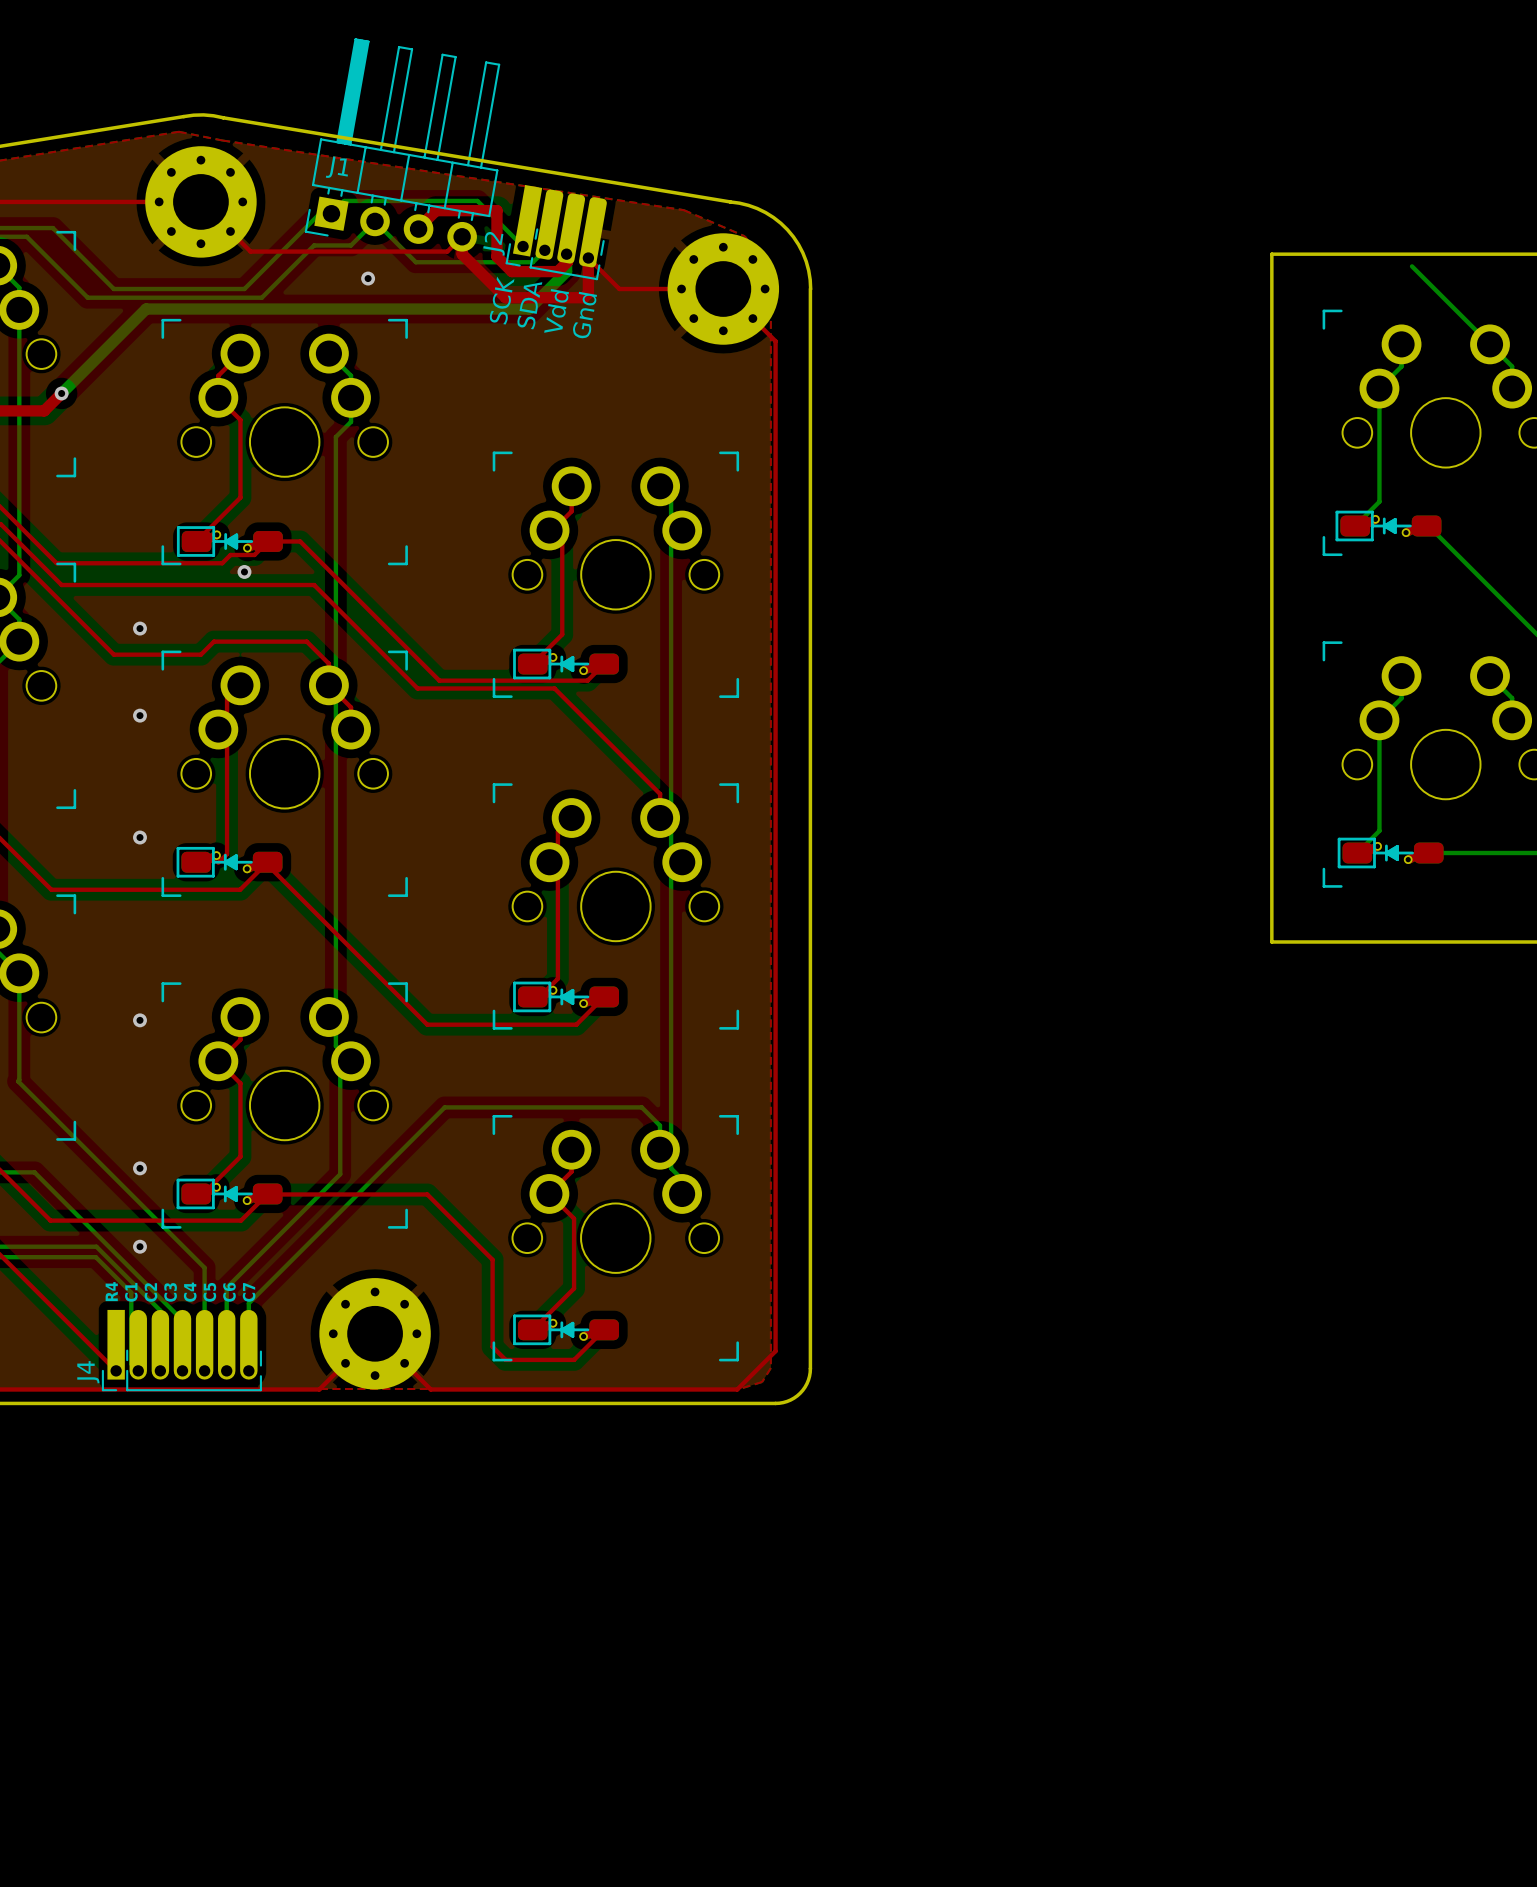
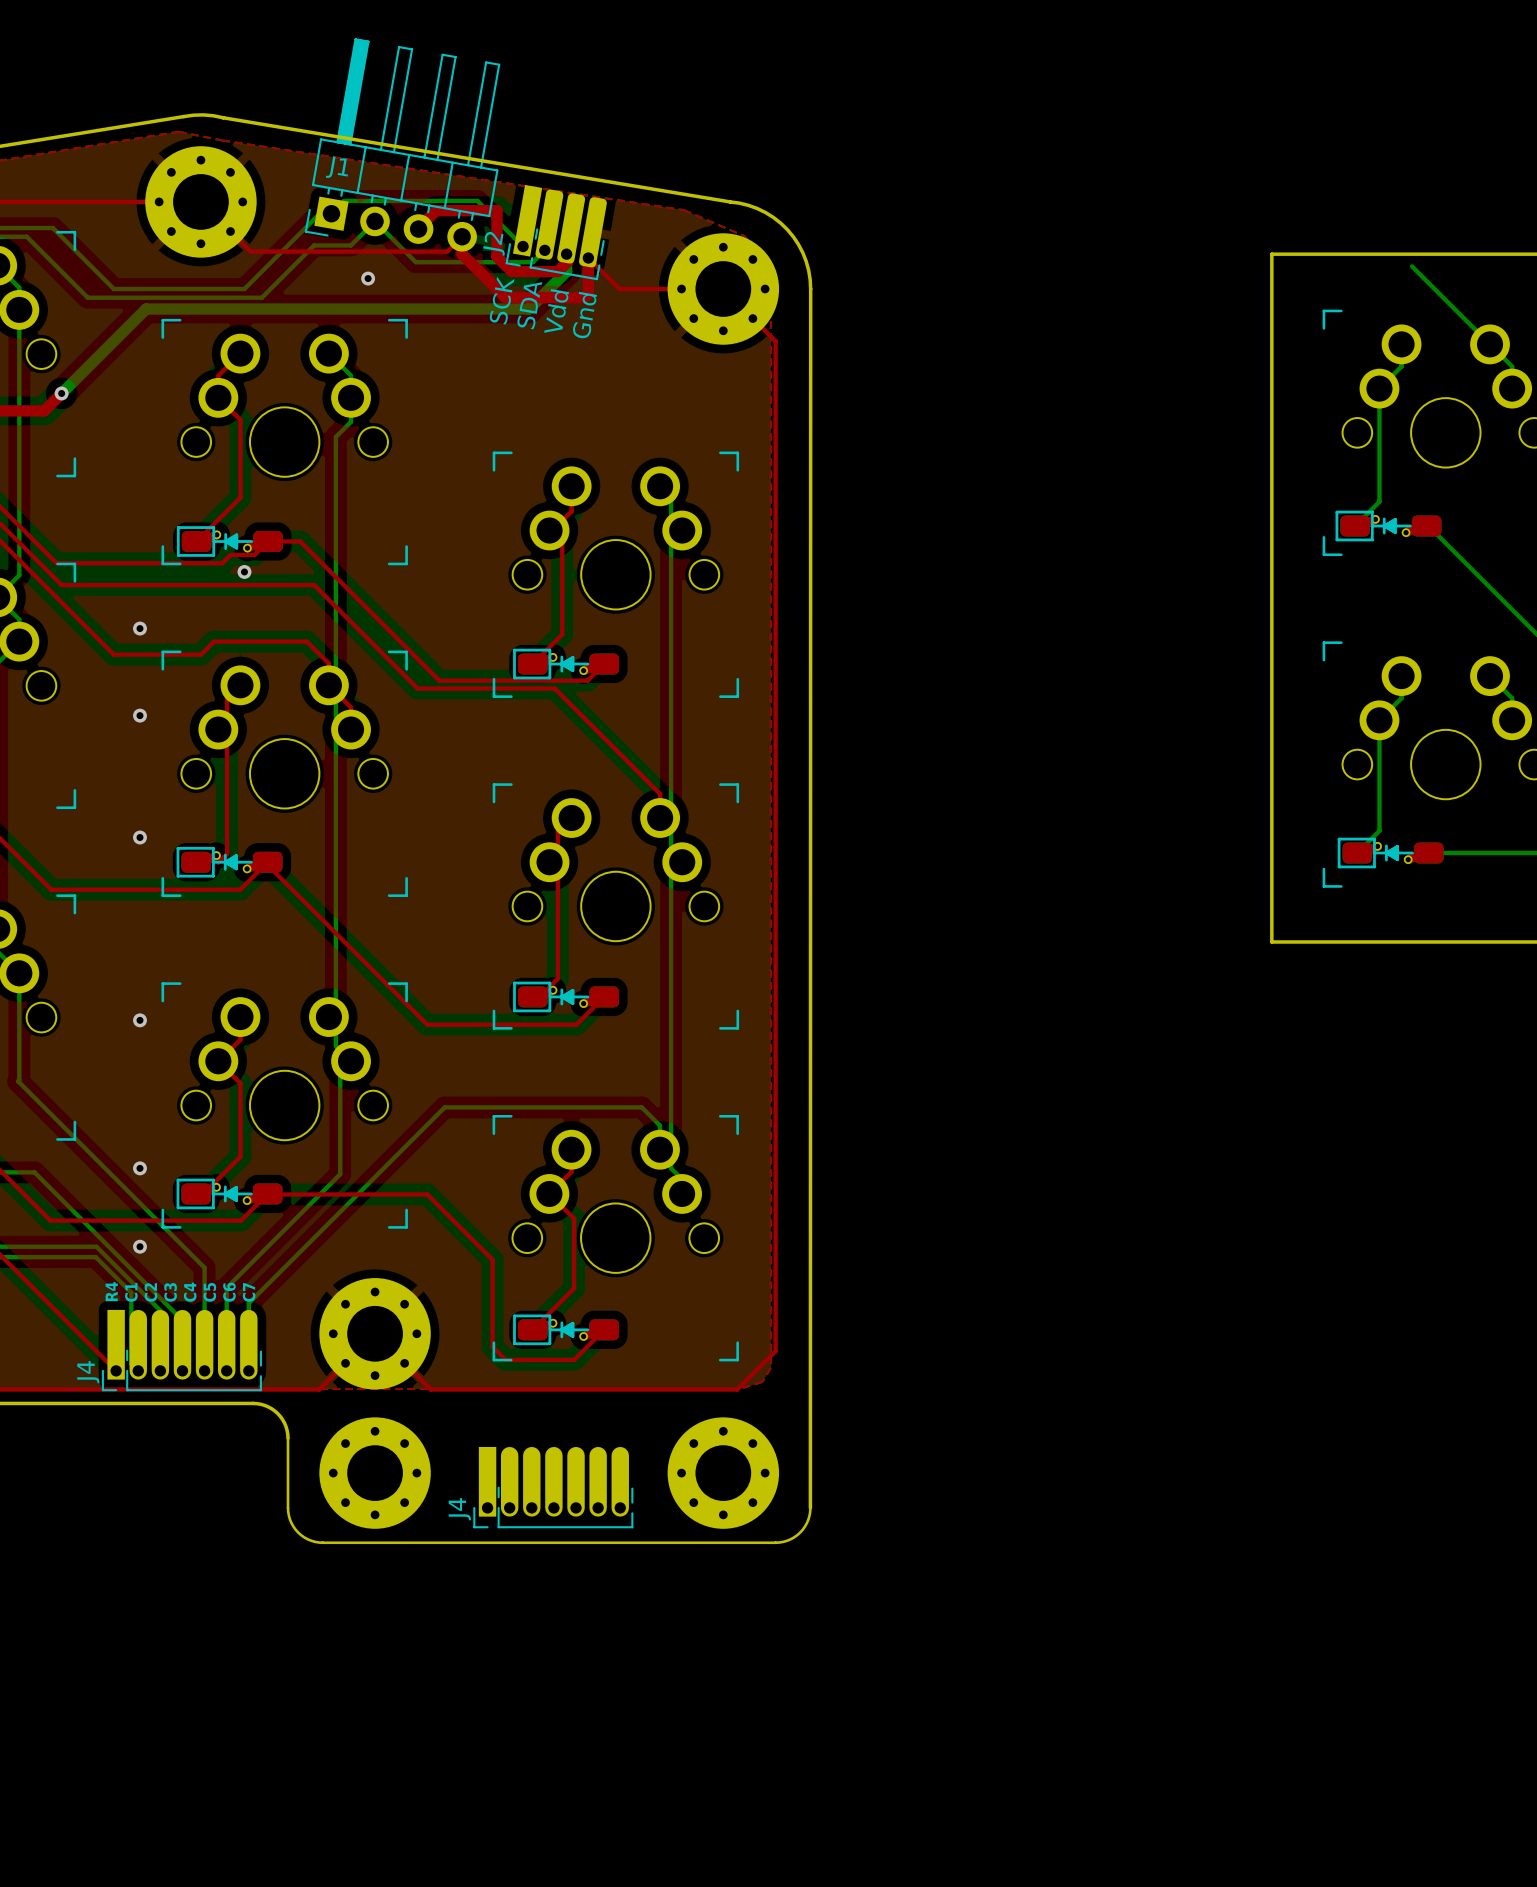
board edge: (810, 289) (810, 1368) (806, 1383) (794, 1398) (775, 1403) (253, 1403) -> (810, 289) (810, 1507) (806, 1523) (794, 1537) (775, 1542) (315, 1541) (298, 1532) (288, 1515) (288, 1438) (284, 1423) (271, 1408) (253, 1403)
part: none -> (375, 1473)
part: none -> (723, 1473)
J4: none -> (553, 1487)

